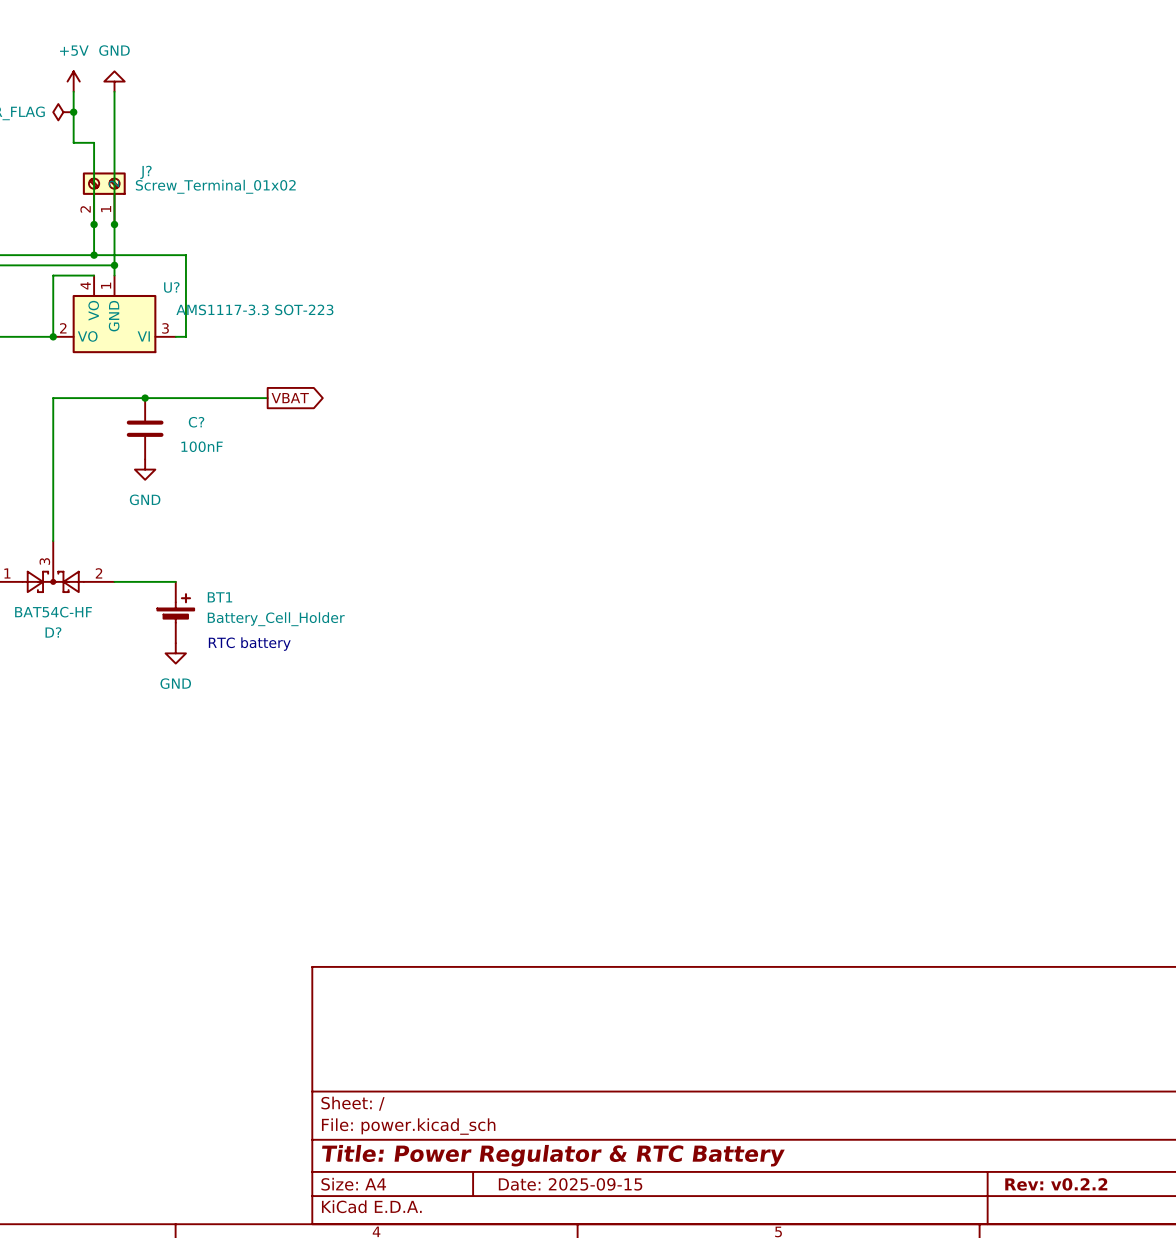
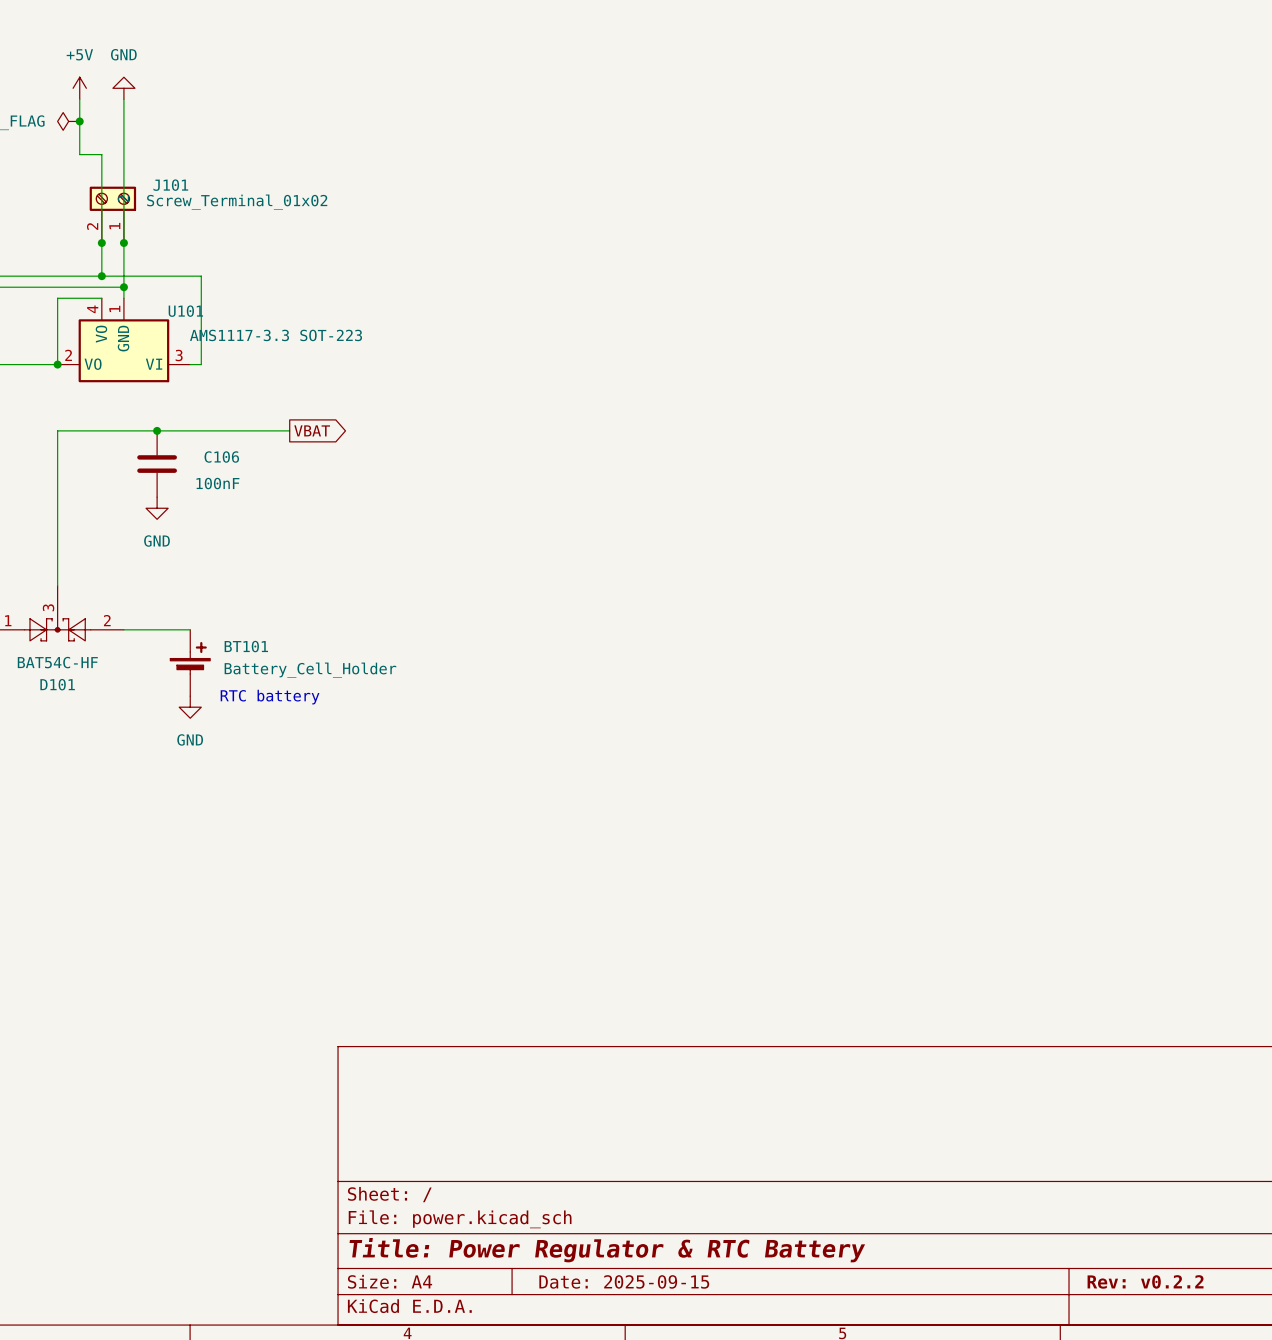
J? name: J? (145, 172) -> J101 (170, 185)
U? name: U? (171, 287) -> U101 (185, 311)
C? name: C? (196, 422) -> C106 (221, 457)
BT1 name: BT1 (219, 597) -> BT101 (246, 646)
D? name: D? (53, 632) -> D101 (57, 684)

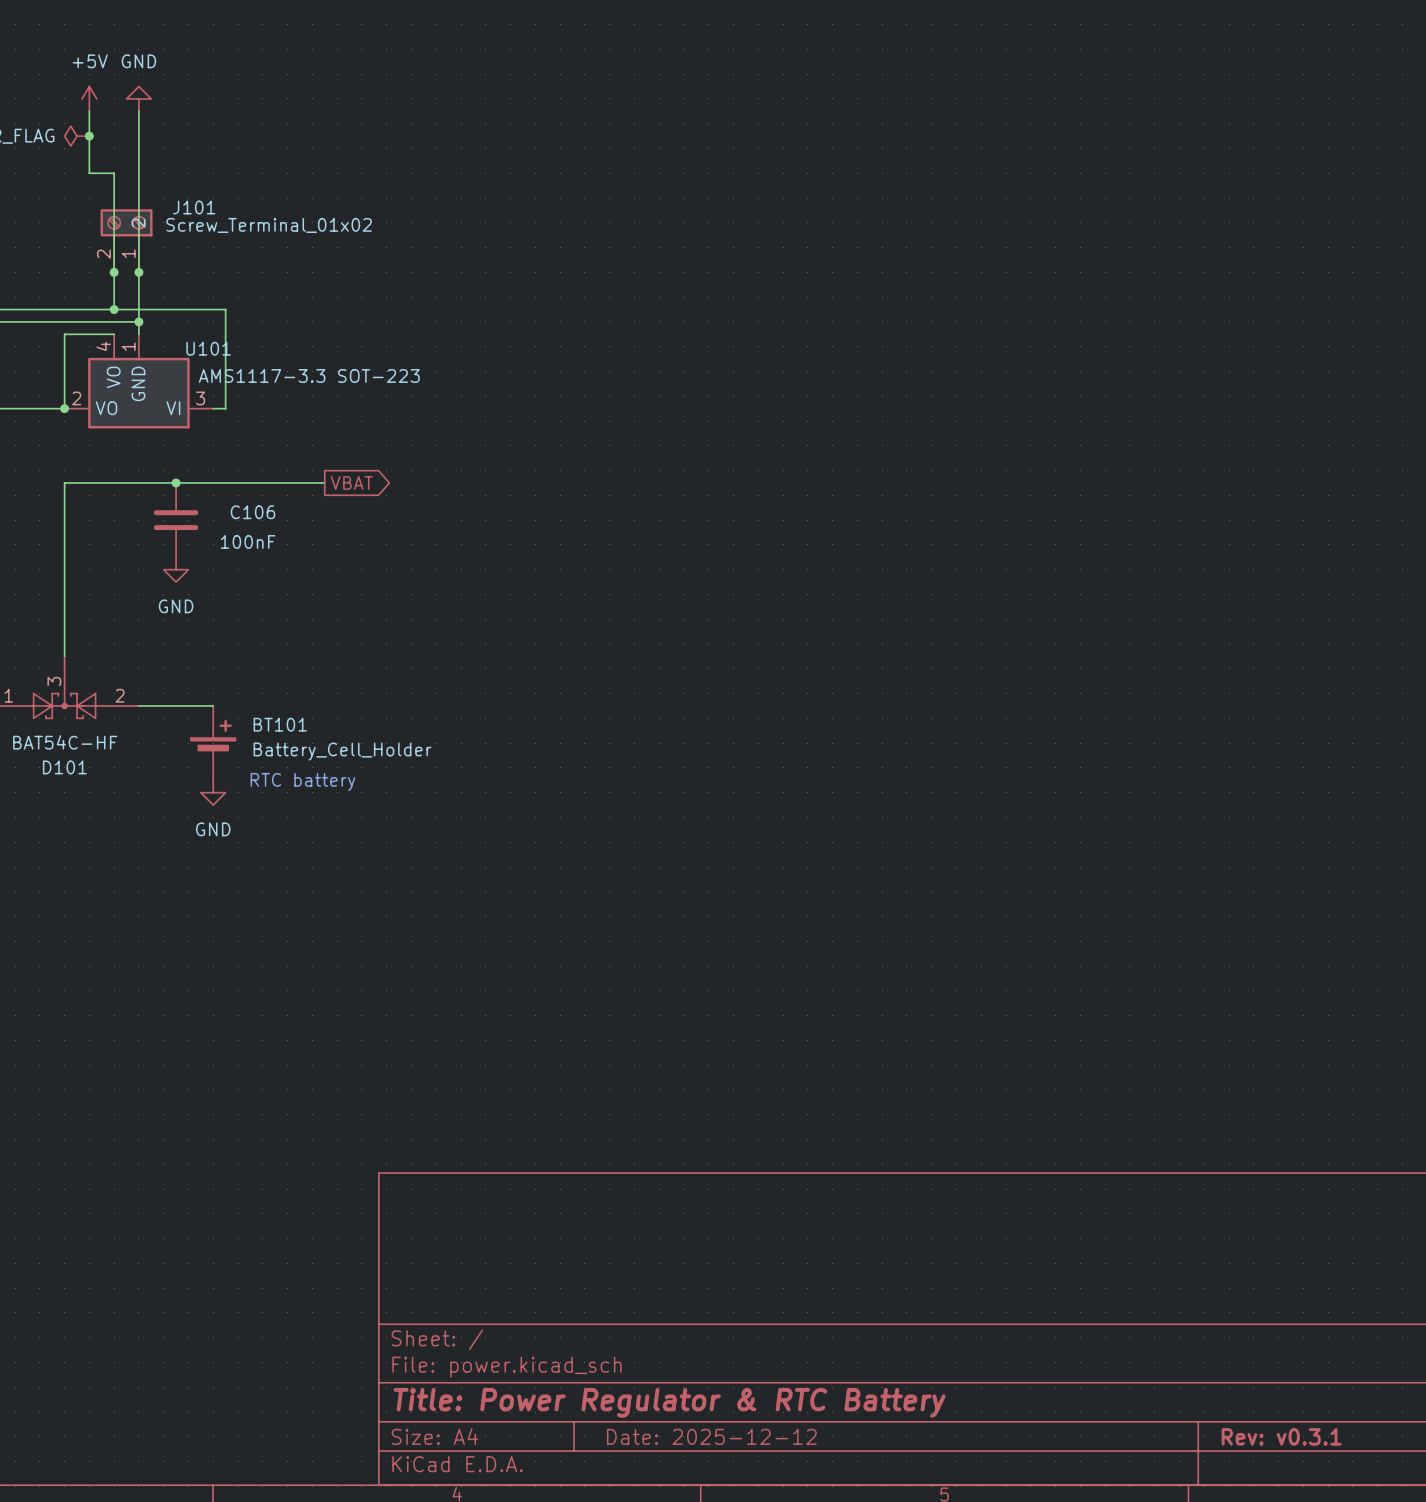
title block: Date: 2025-09-15 (624, 1281) -> Date: 2025-12-12 (711, 1436)
title block: Rev: v0.2.2 (1145, 1281) -> Rev: v0.3.1 (1281, 1436)

